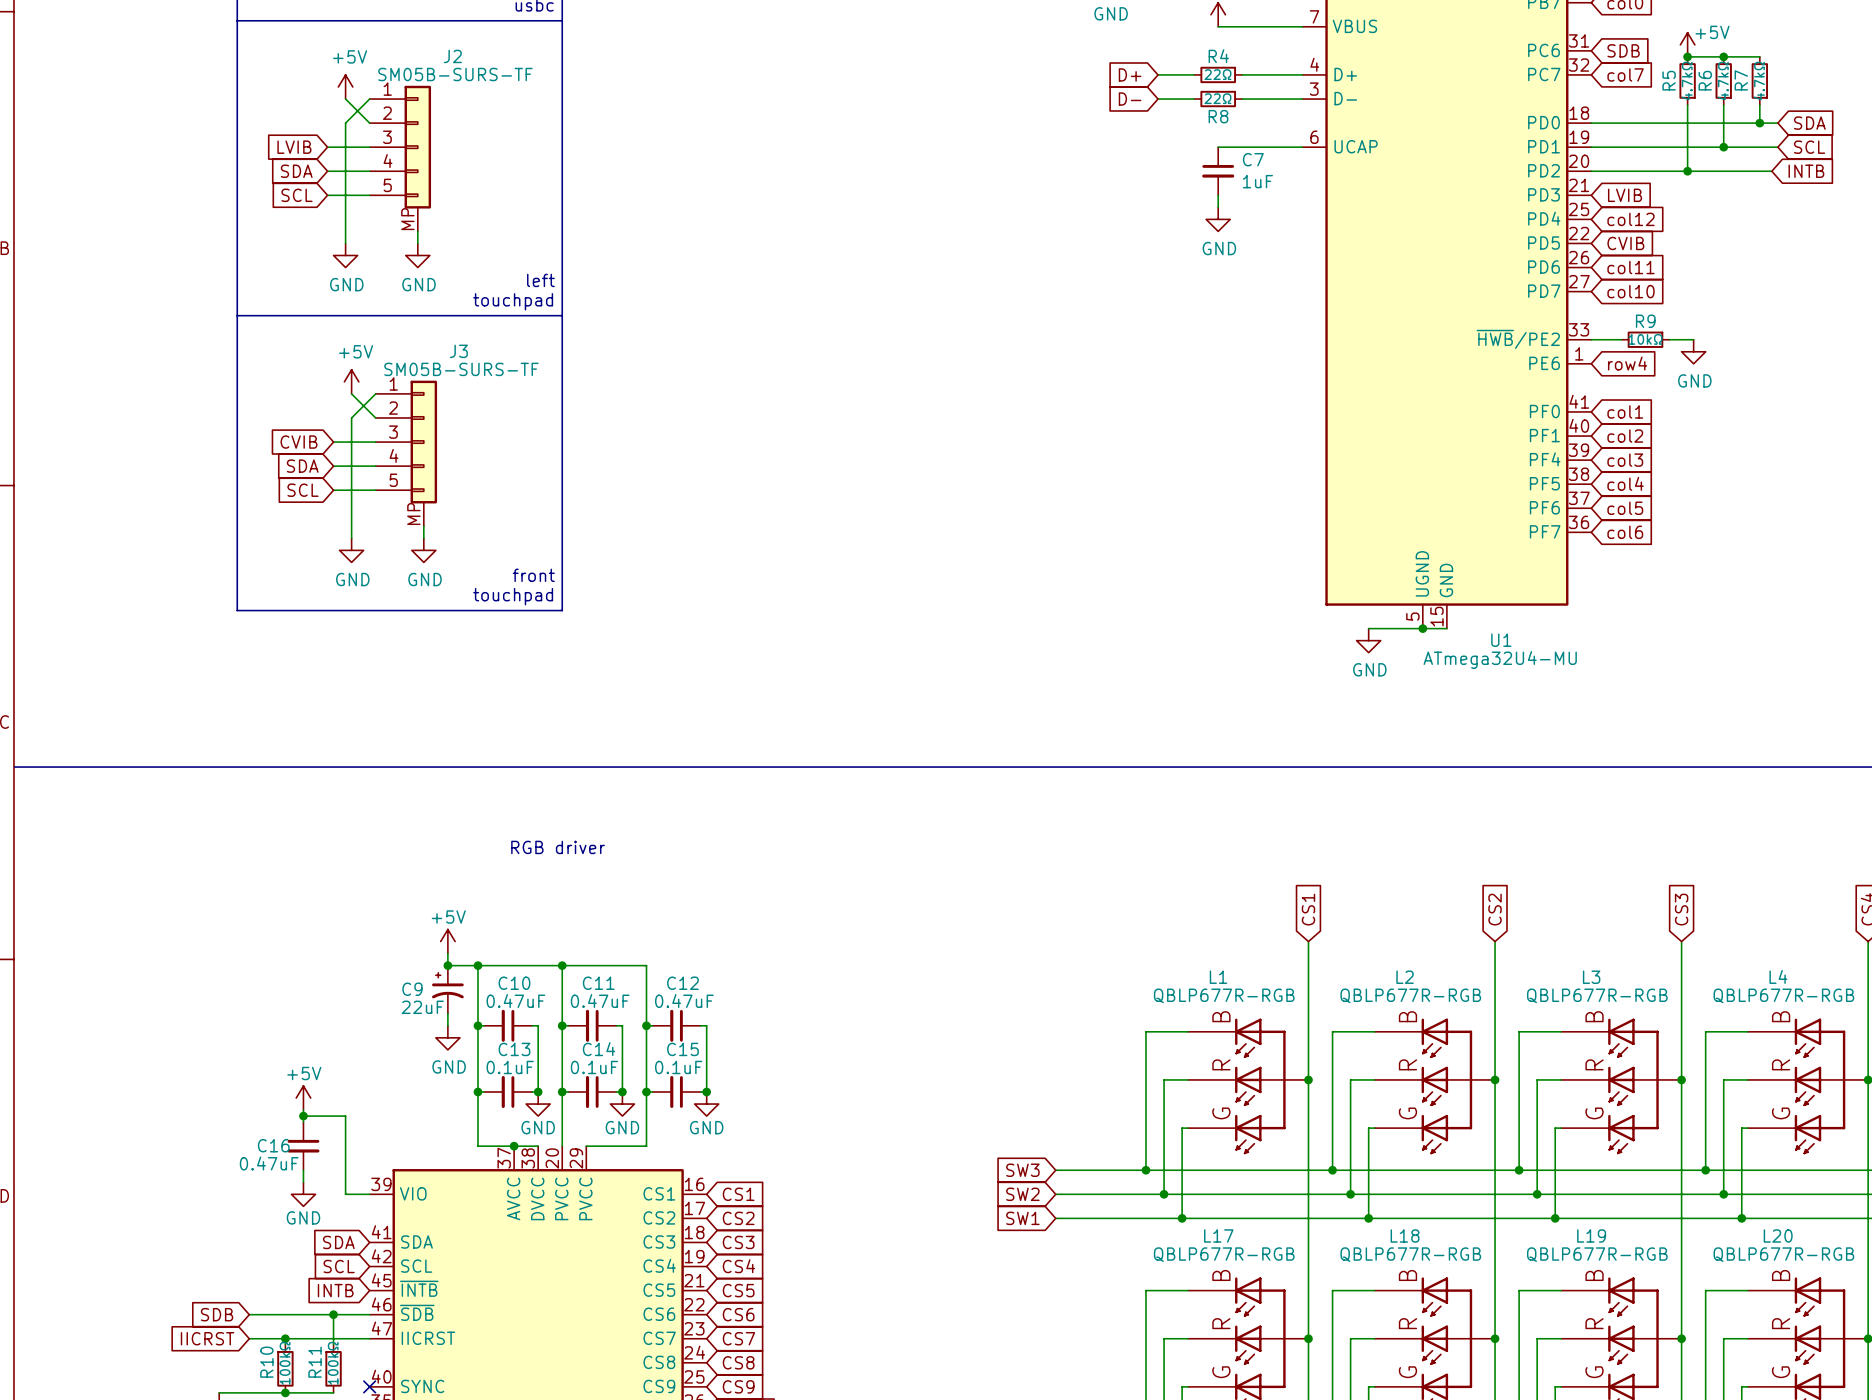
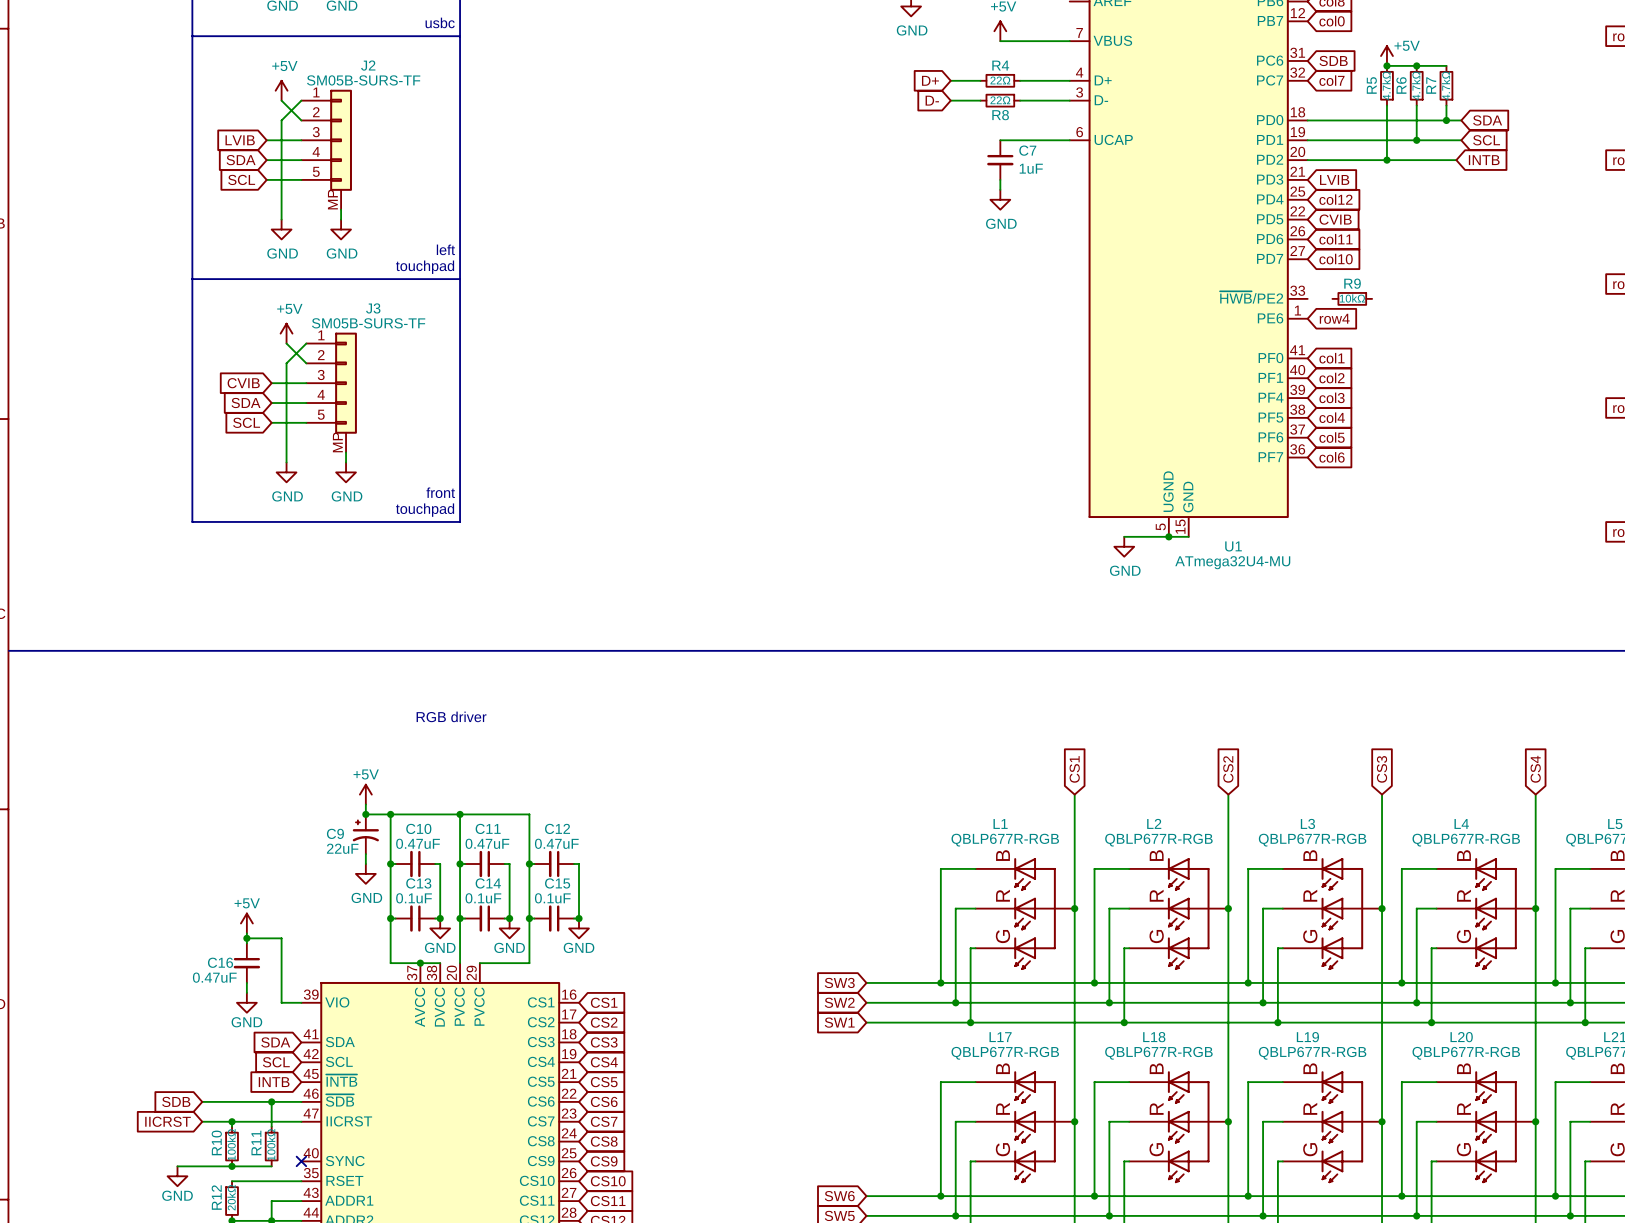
wire: (1591, 339) (1621, 339) -> none
wire: (1669, 339) (1693, 339) -> none
power symbol: GND (1693, 351) -> none

